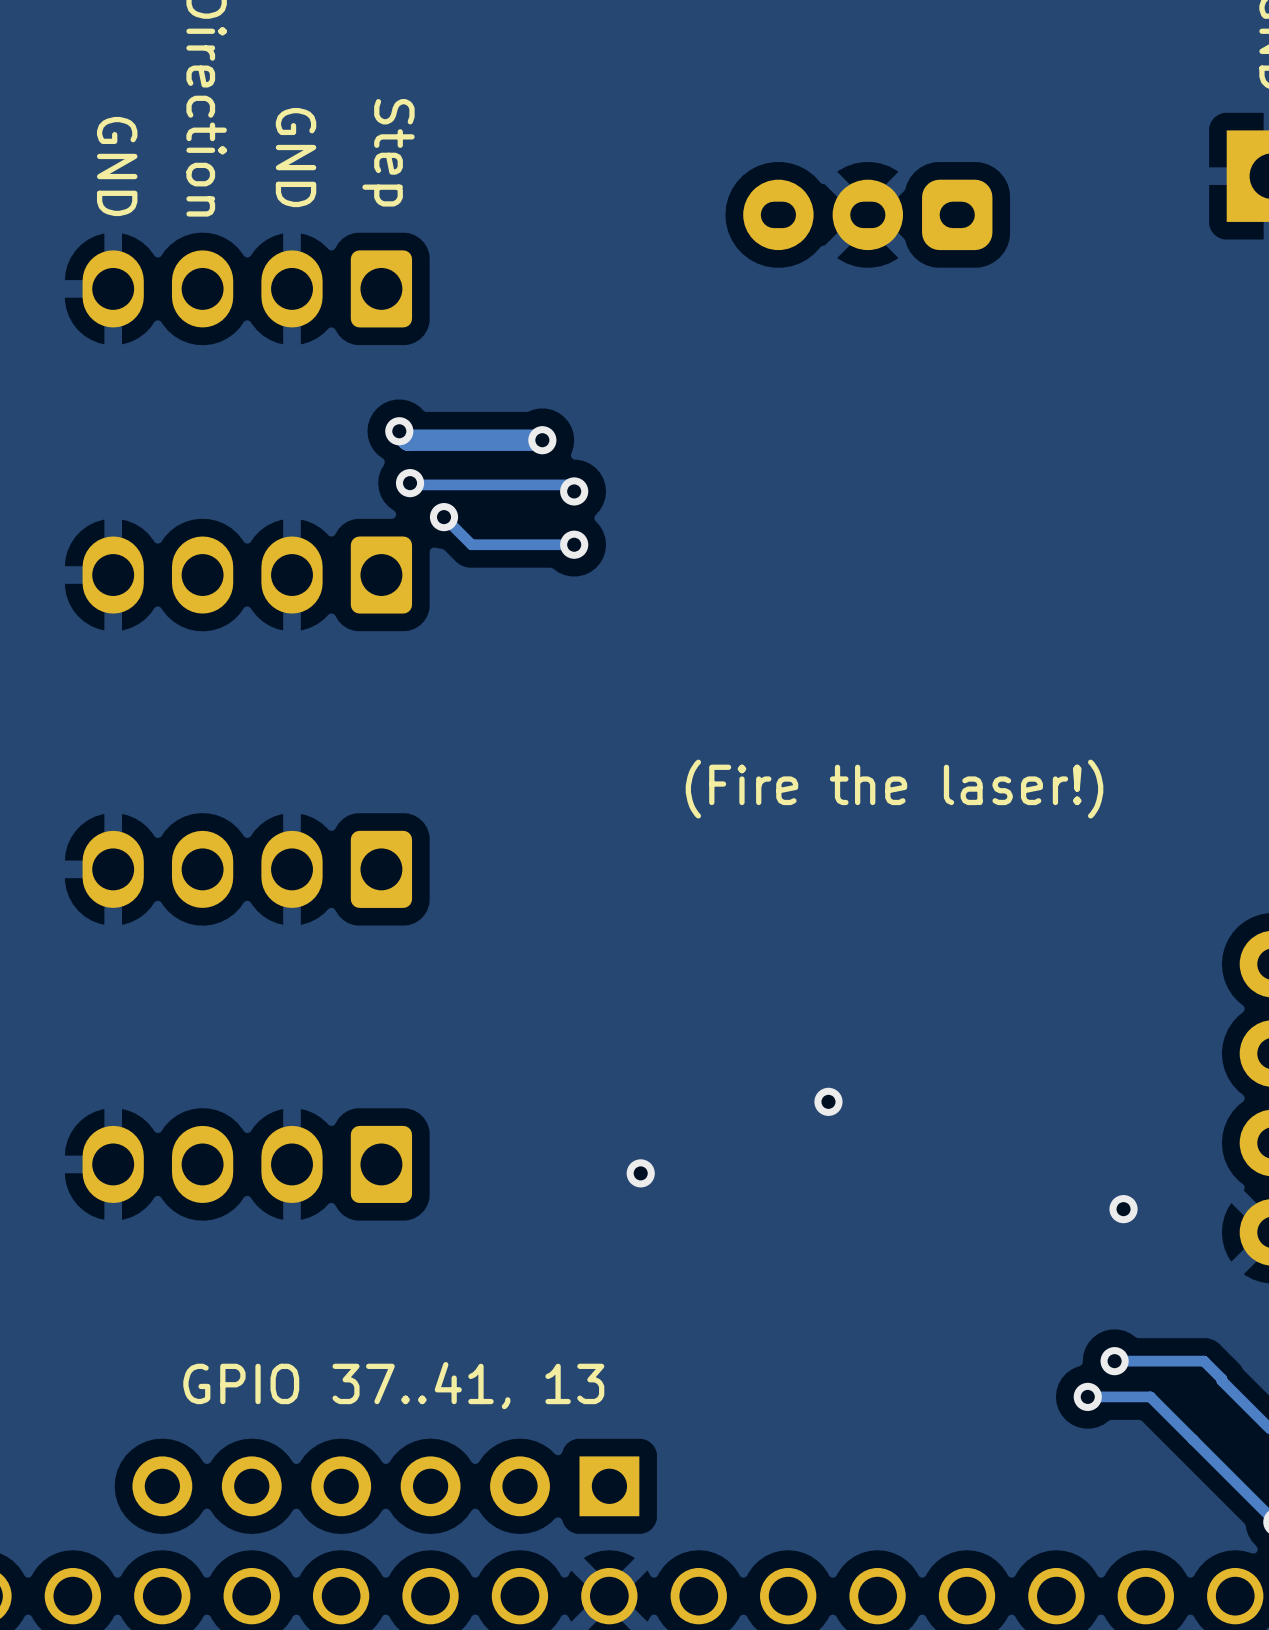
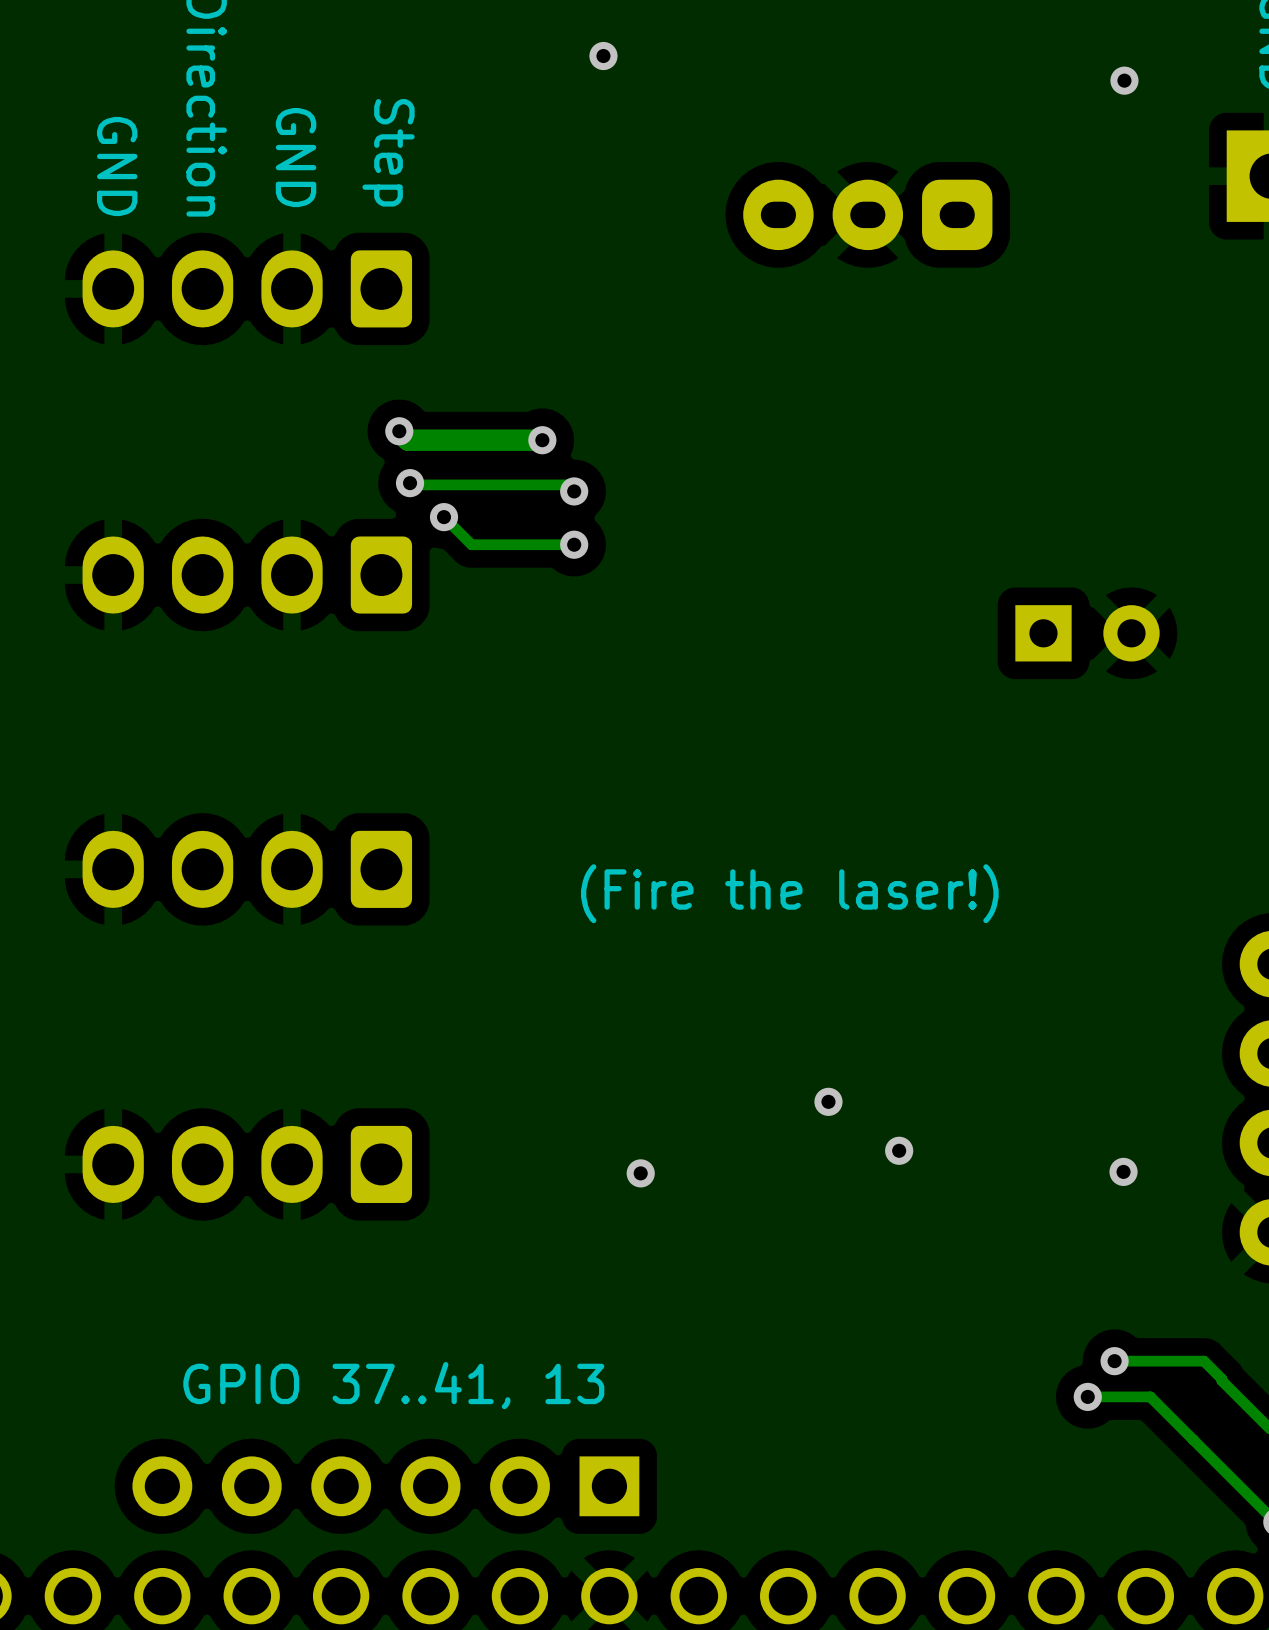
via: none -> (603, 56)
via: none -> (1124, 80)
part: none -> (1087, 633)
text position: (Fire the laser!) (894, 789) -> (Fire the laser!) (789, 893)
via: none -> (899, 1150)
via position: (1123, 1209) -> (1123, 1171)

